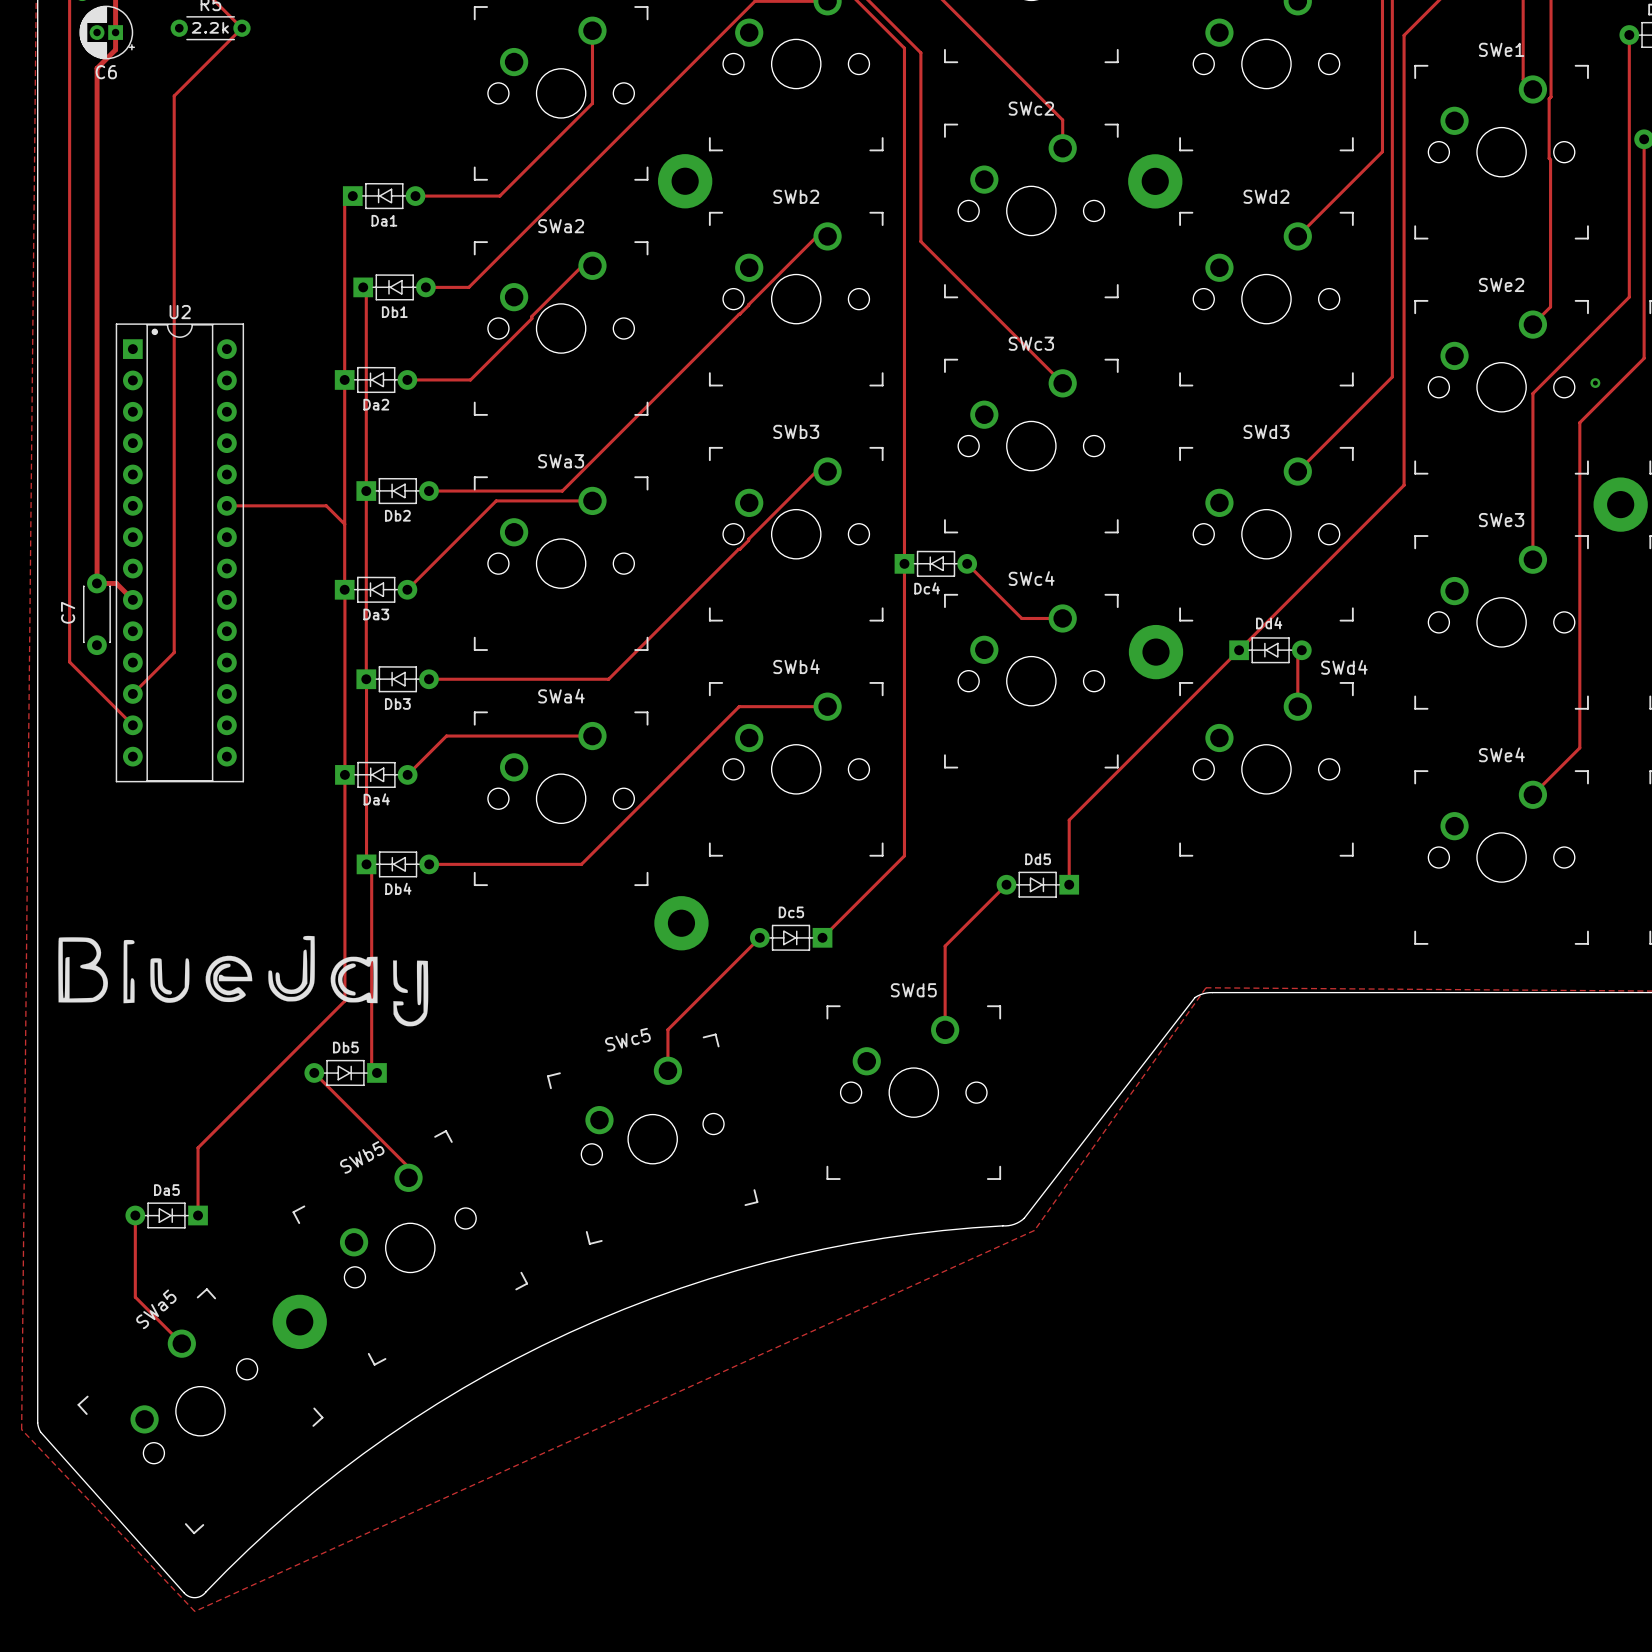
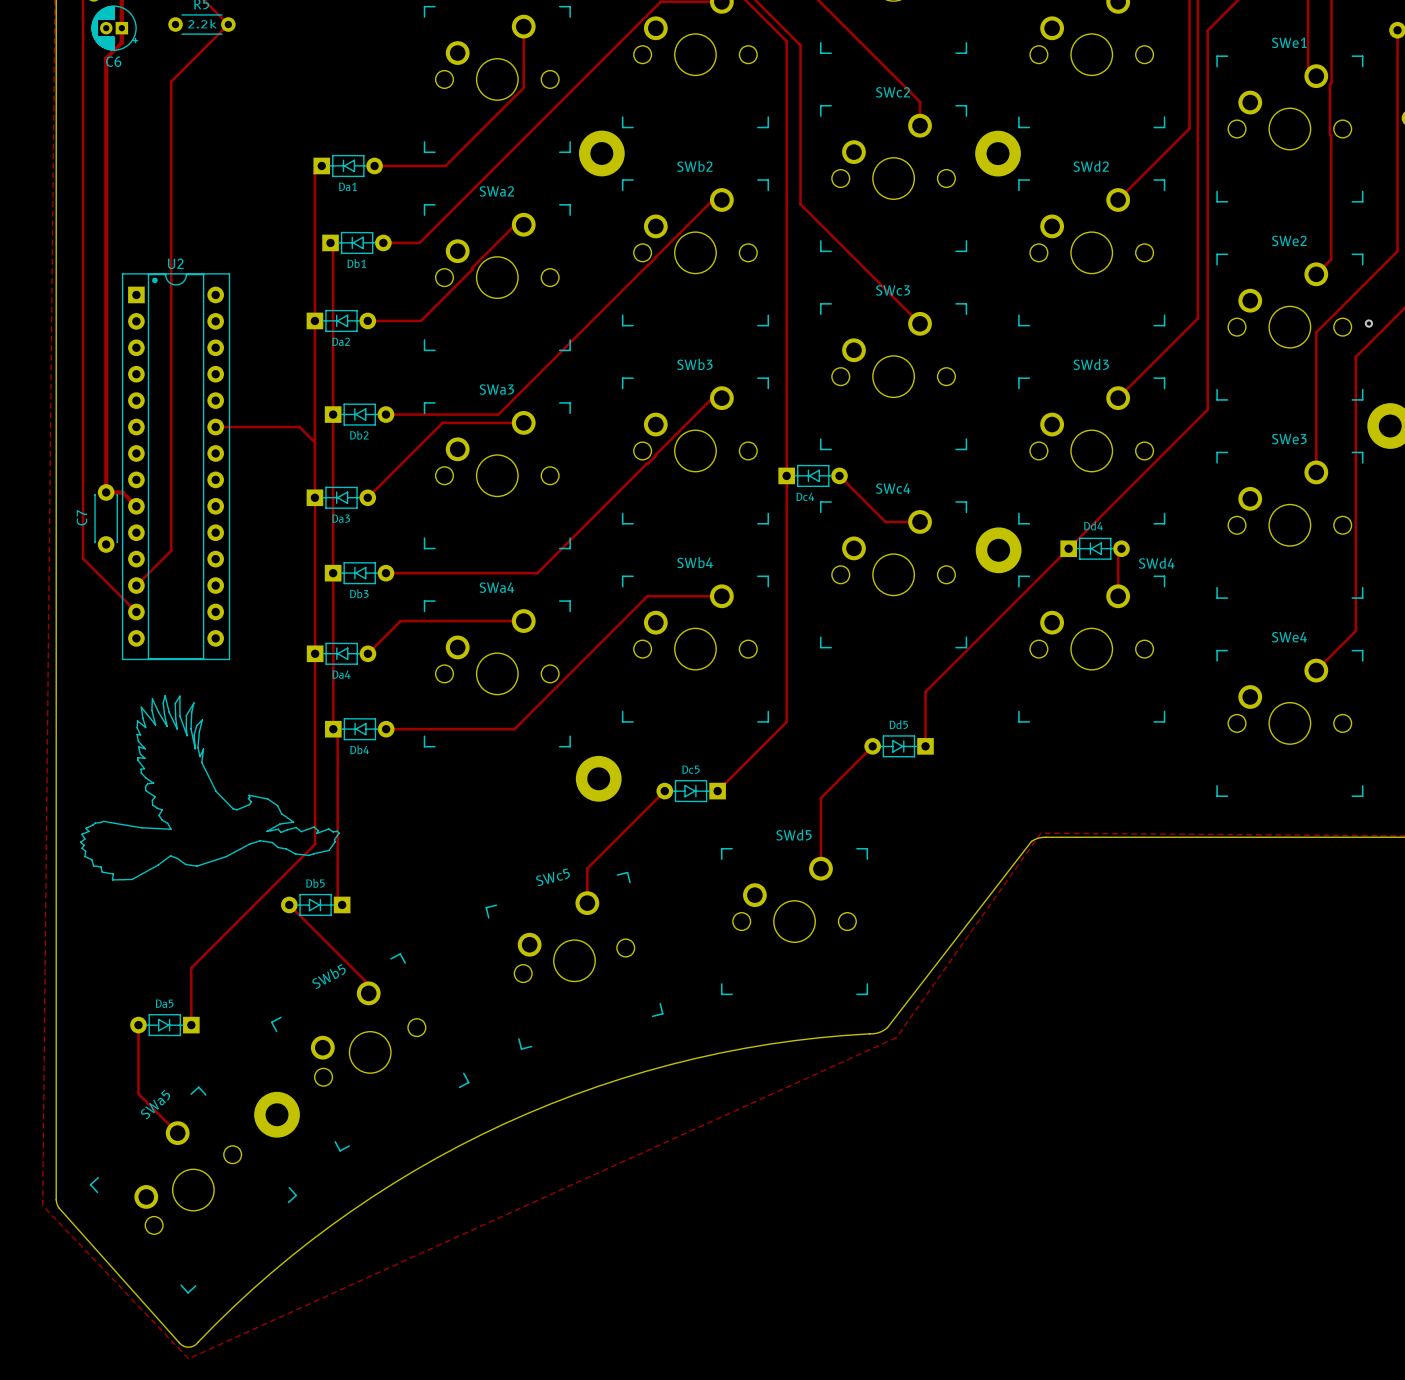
drawing: none -> [79, 694, 340, 881]
drawing: [58, 935, 429, 1027] -> none

